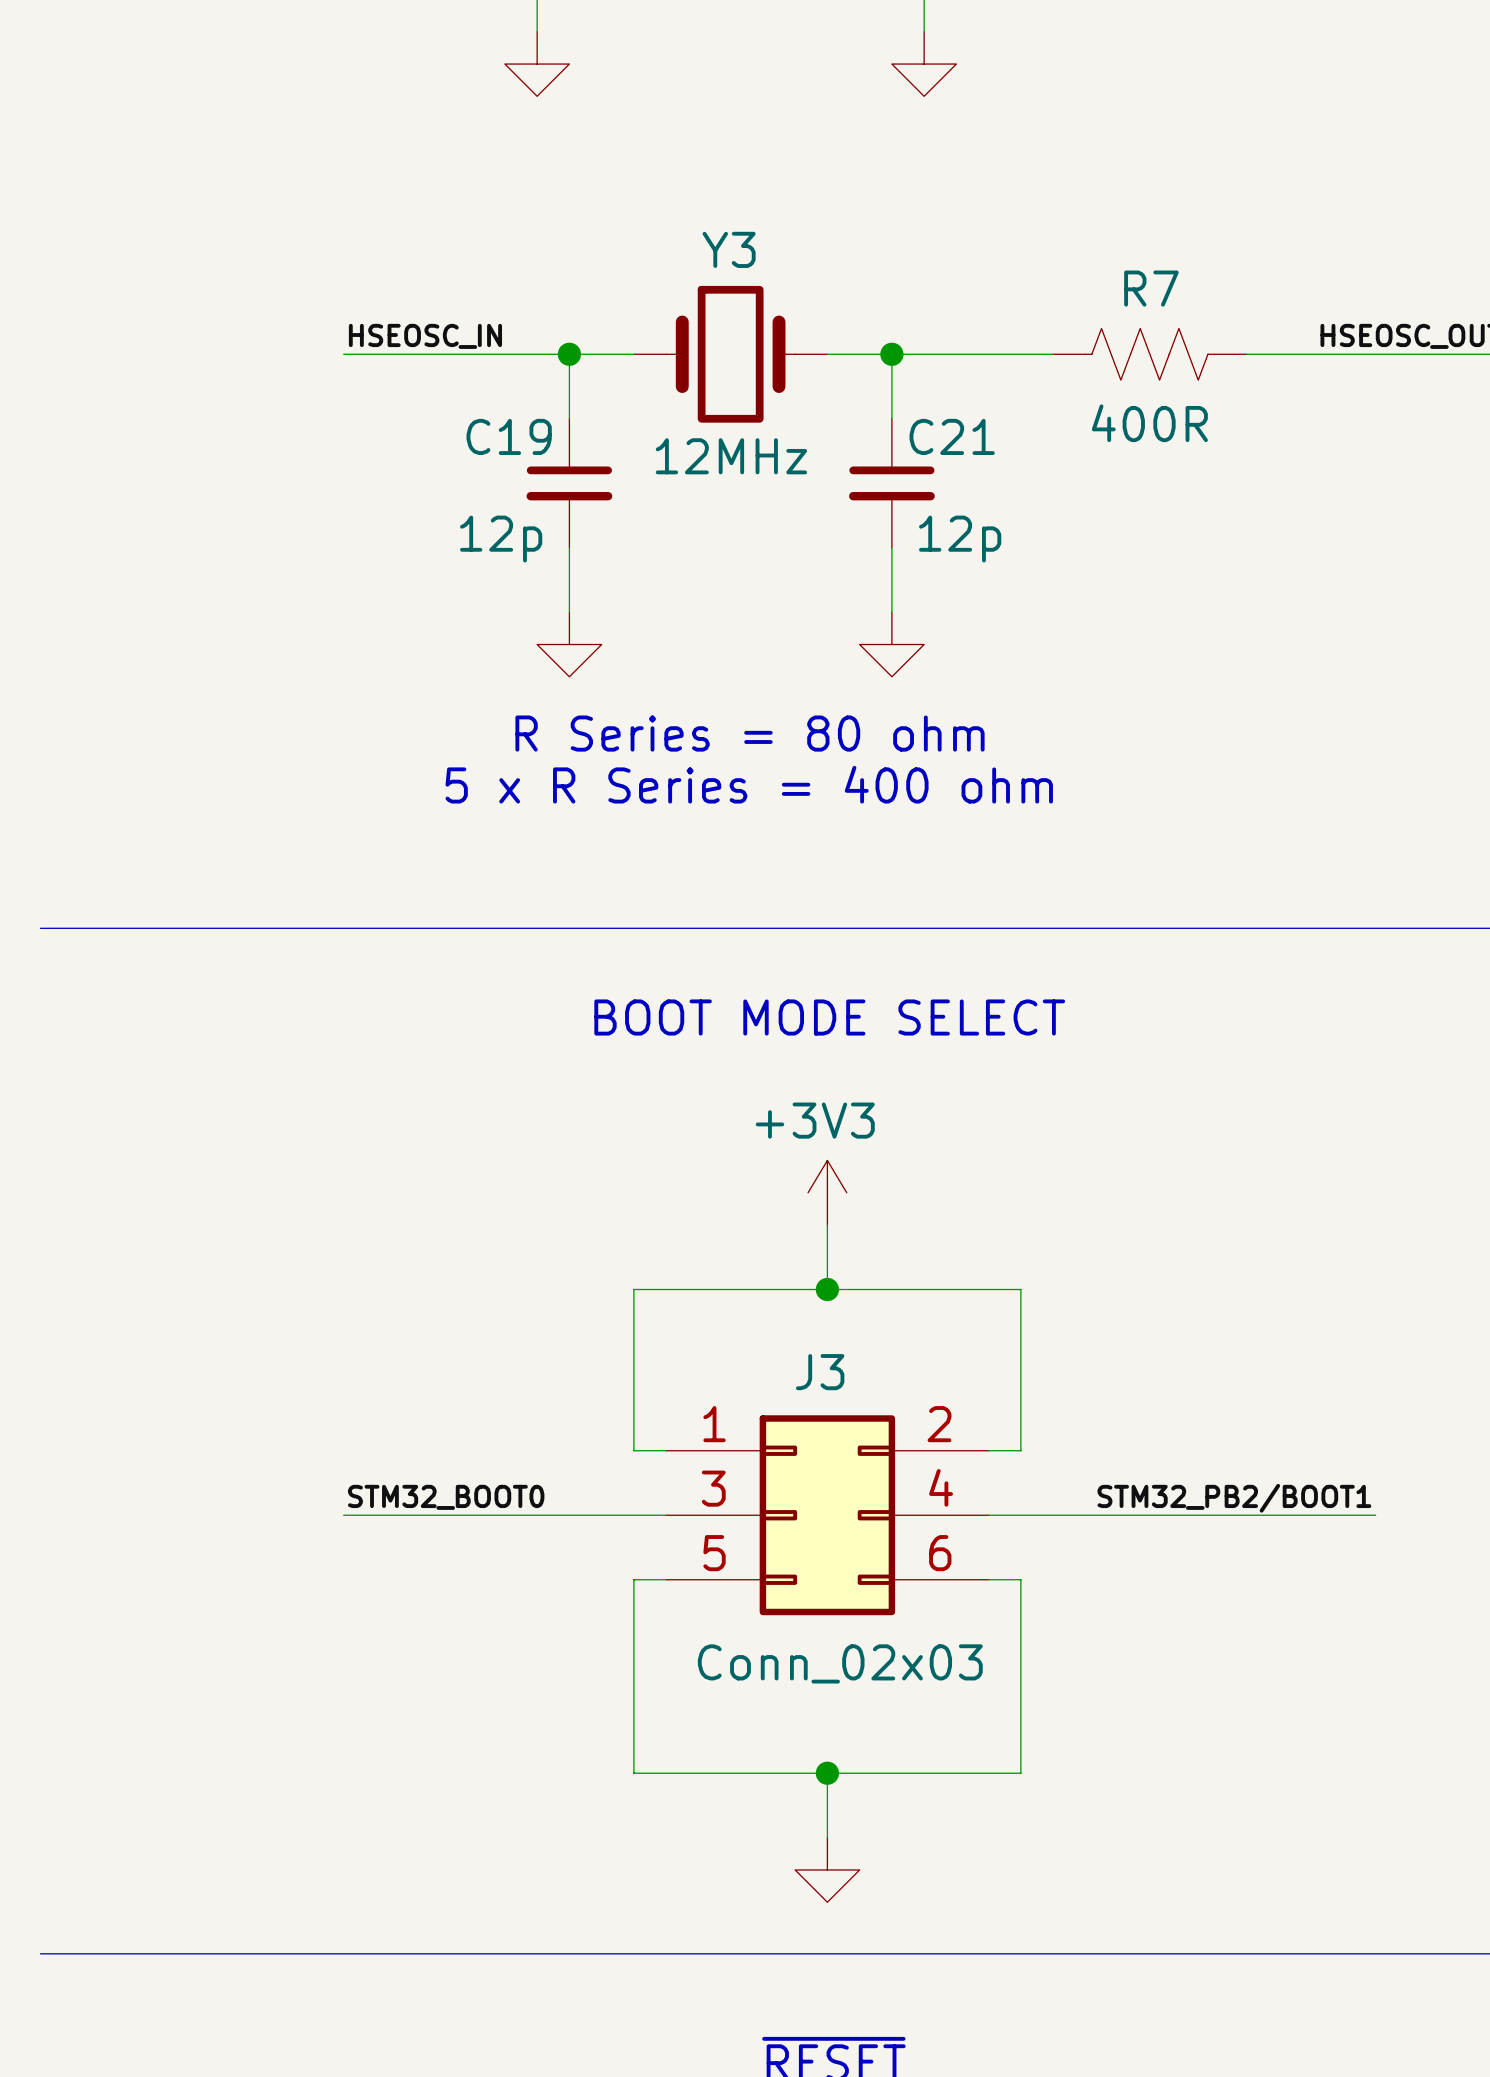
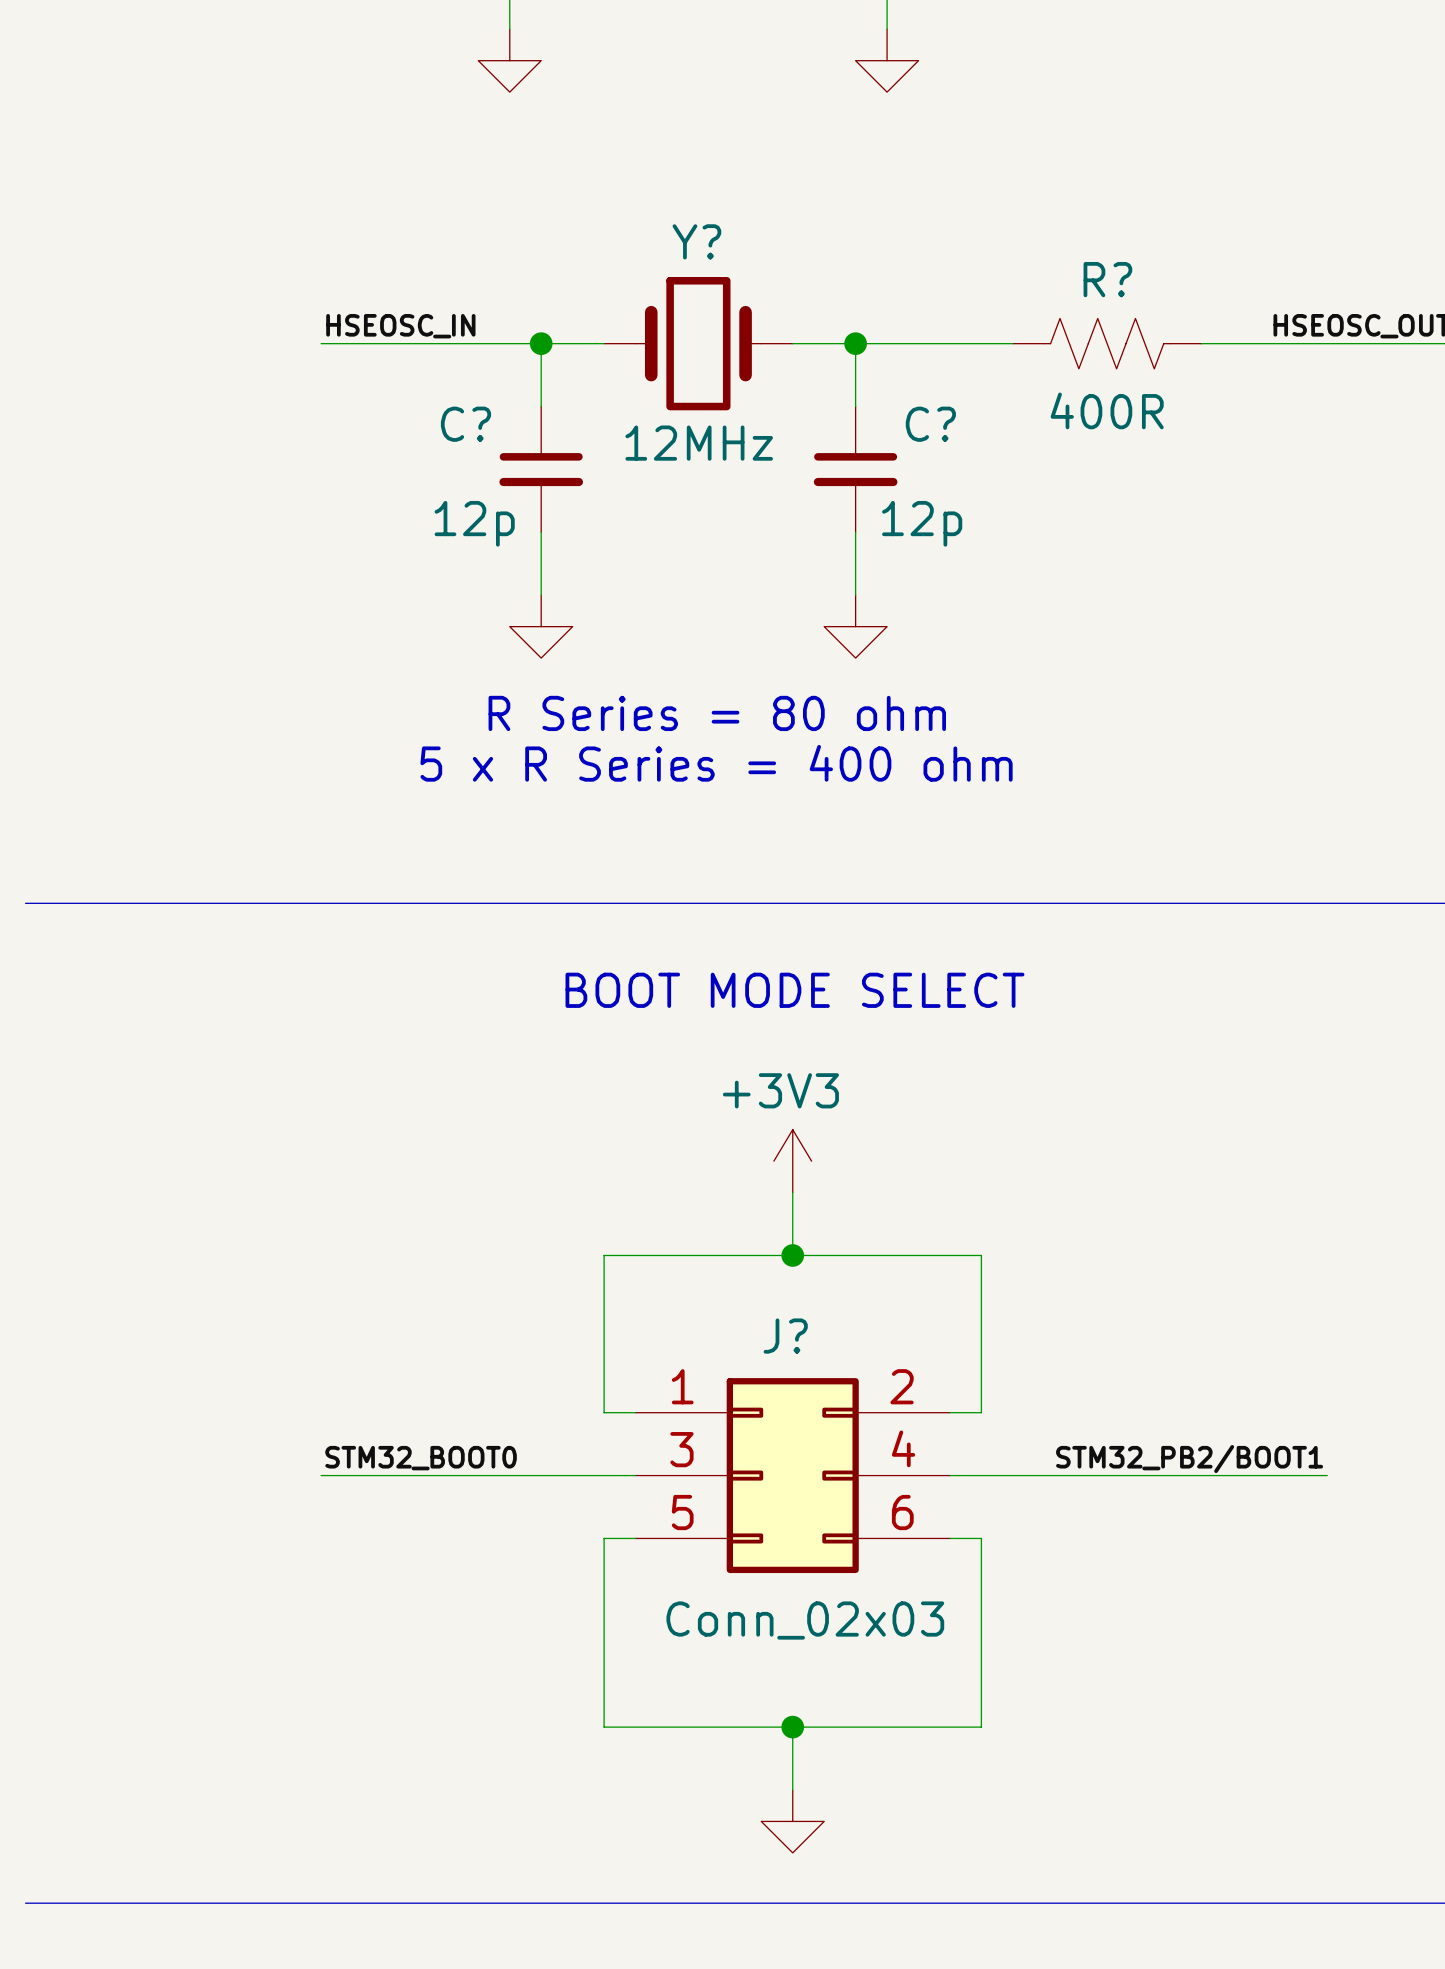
Y3 name: Y3 (729, 249) -> Y? (696, 241)
R7 name: R7 (1151, 288) -> R? (1107, 279)
C19 name: C19 (509, 436) -> C? (465, 424)
C21 name: C21 (952, 436) -> C? (930, 424)
J3 name: J3 (820, 1372) -> J? (785, 1336)

